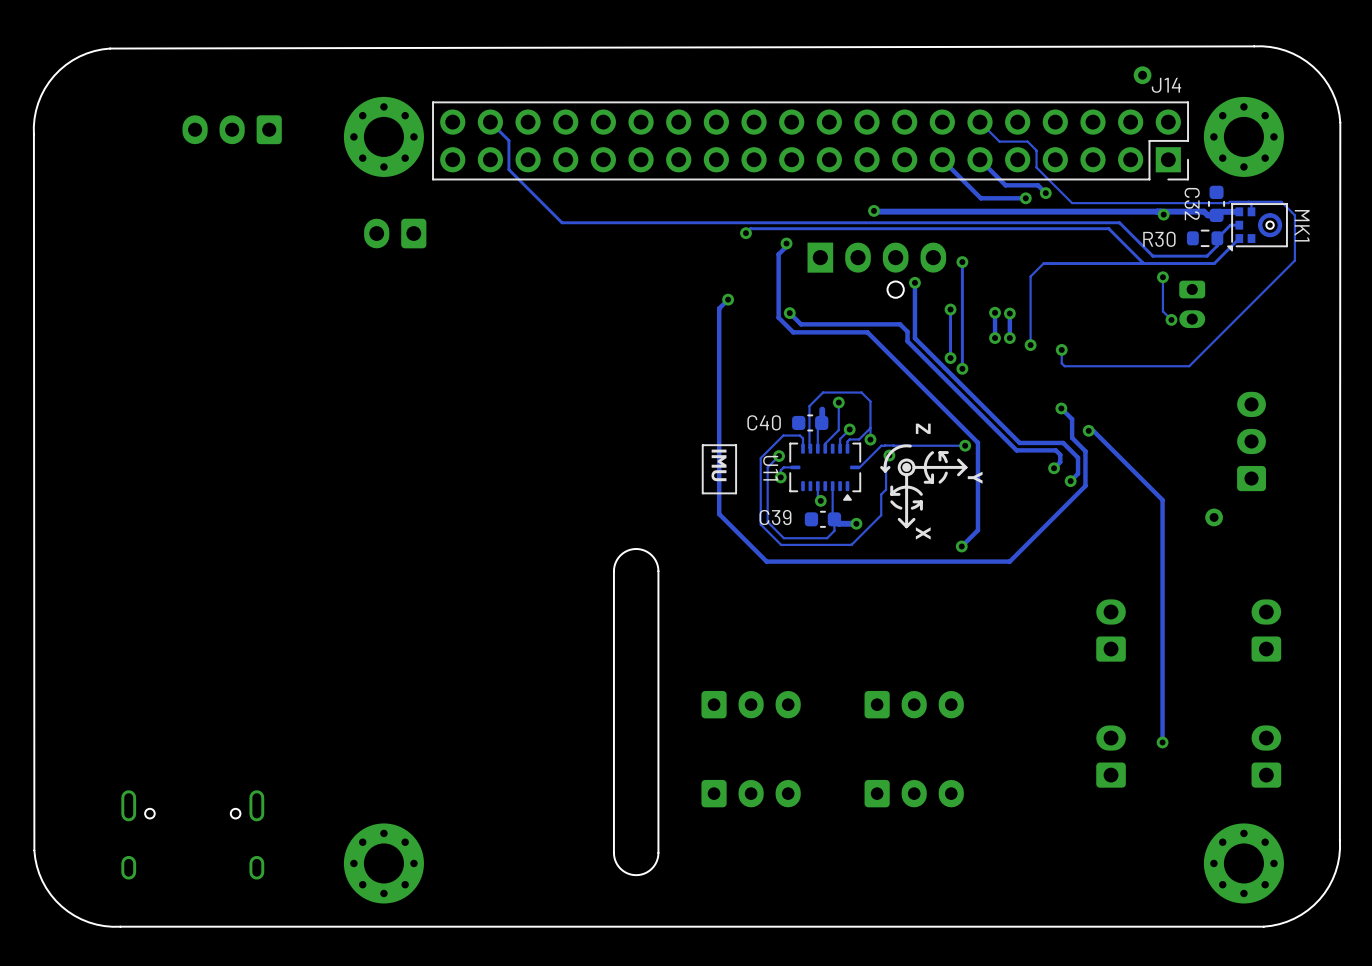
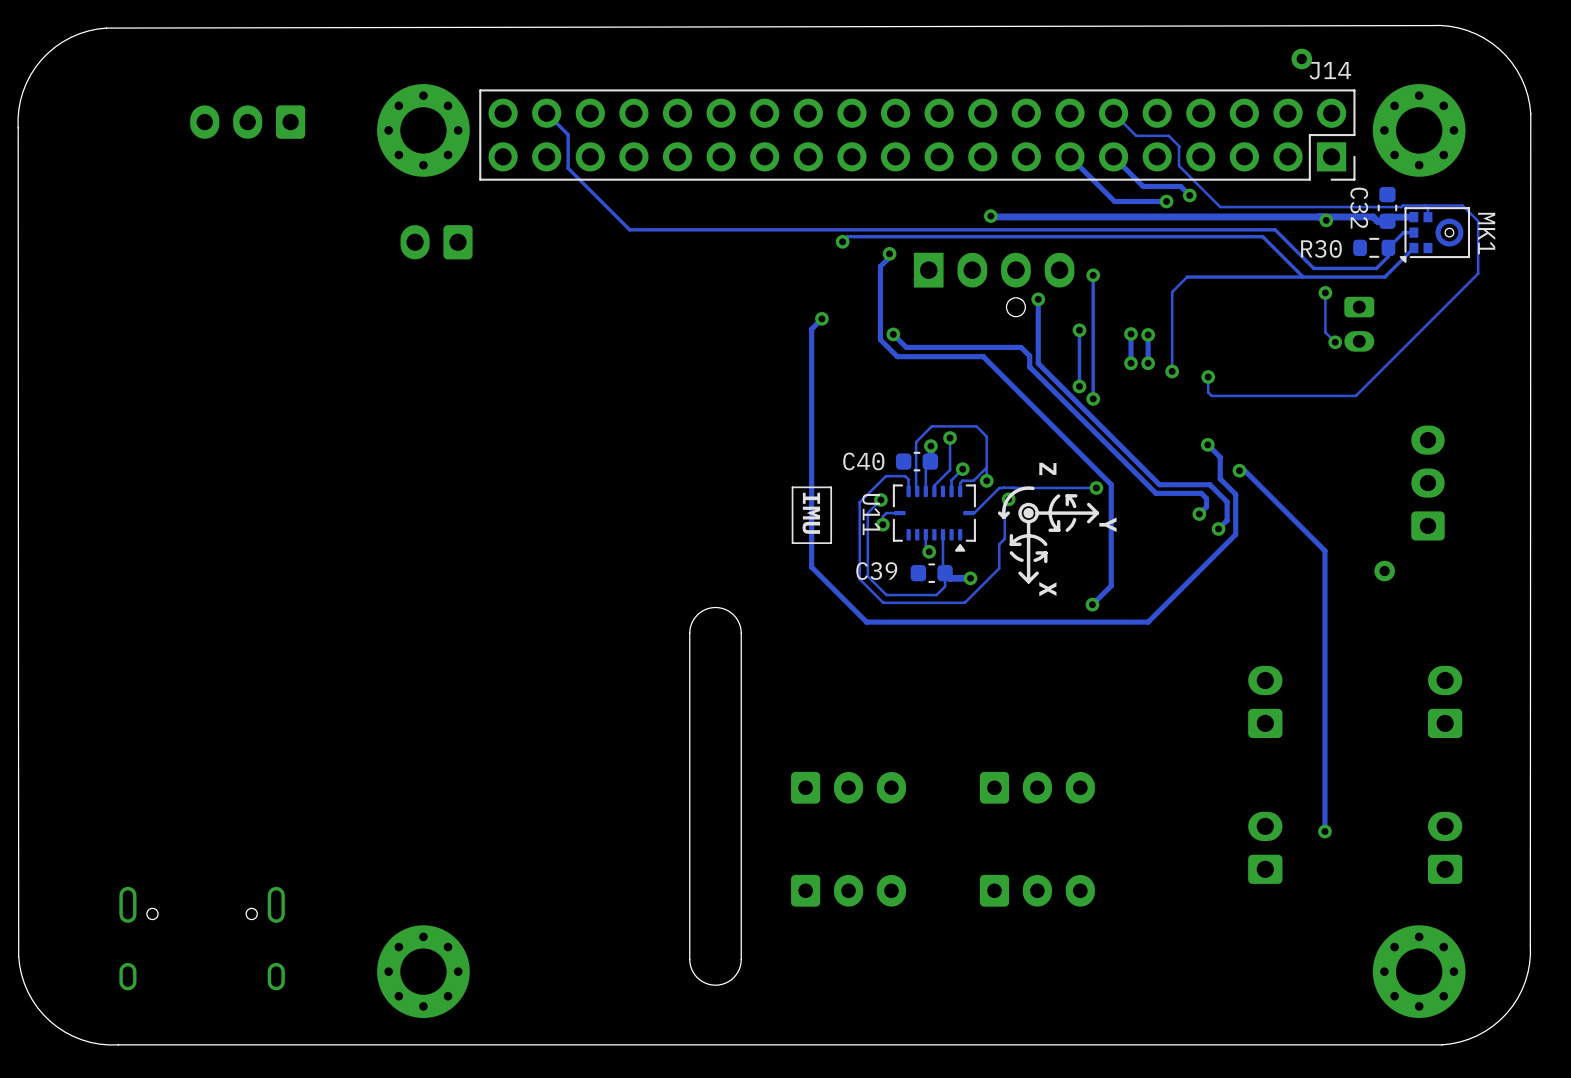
via: none -> (930, 446)

